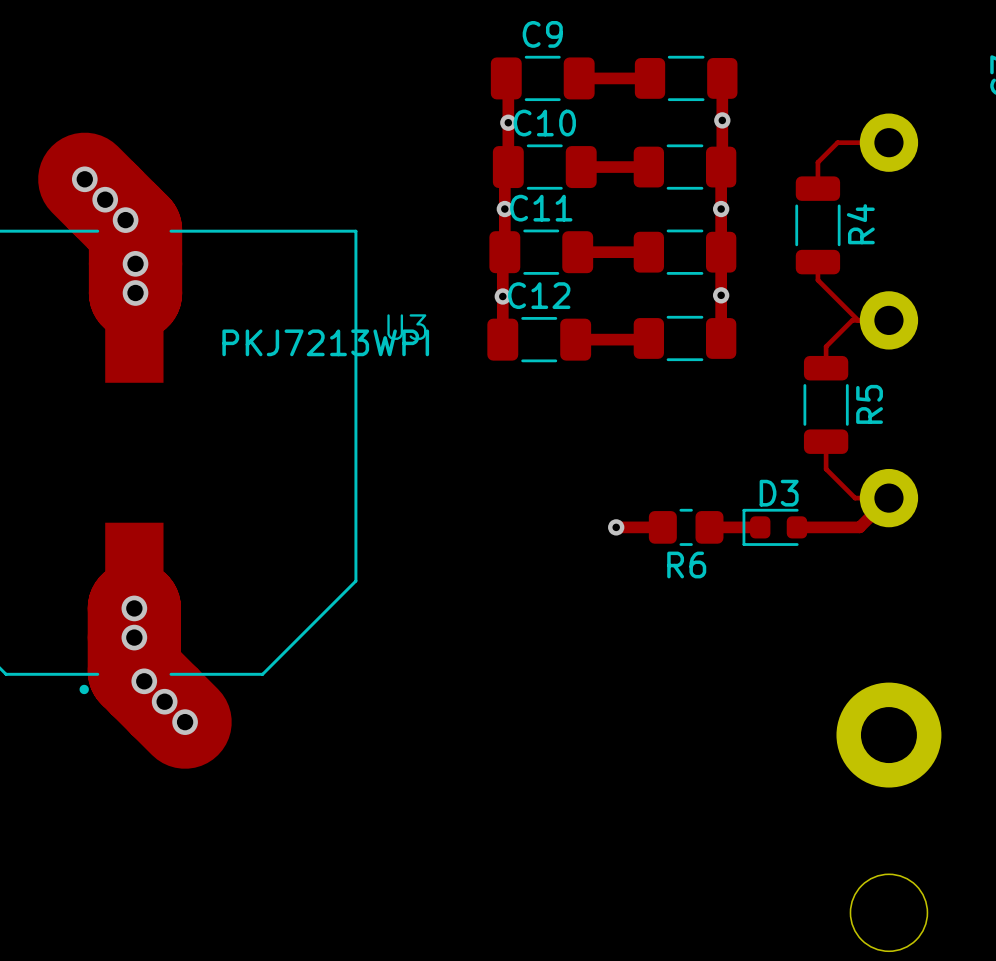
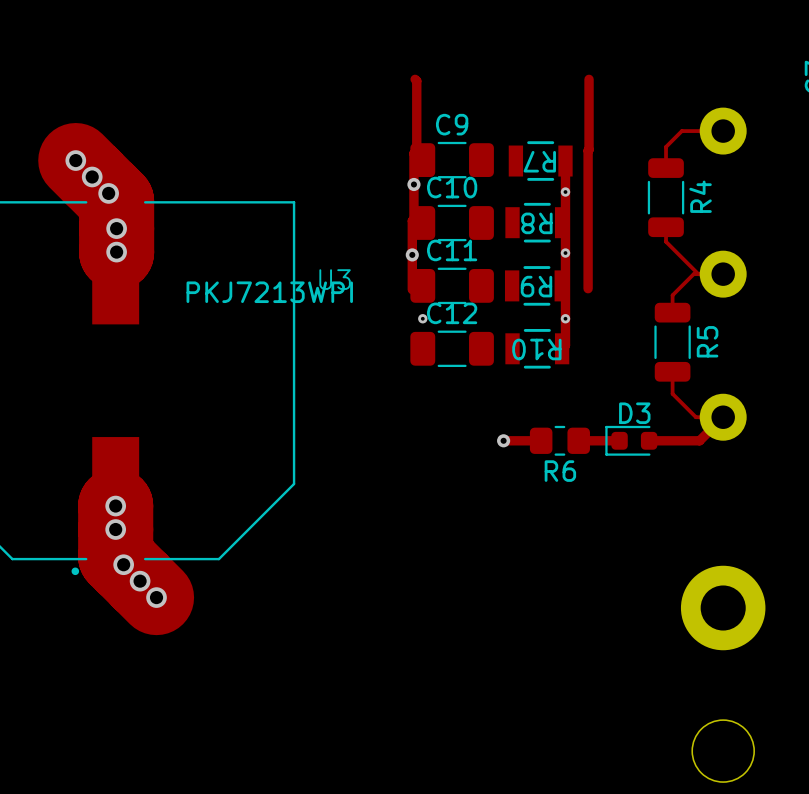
C9 position: (542, 78) -> (452, 160)
track: (579, 78) (650, 78) -> none
part: (686, 78) -> none
via: (722, 120) -> none
via: (508, 122) -> none
C10 position: (544, 167) -> (452, 222)
track: (581, 167) (648, 167) -> none
part: (685, 167) -> none
R7: none -> (540, 161)
track: none -> (565, 161) (565, 345) (562, 348)
via: (721, 209) -> none
via: none -> (565, 192)
C11 position: (541, 252) -> (452, 285)
track: (577, 252) (648, 252) -> none
part: (685, 252) -> none
R8: none -> (537, 222)
via: none -> (565, 253)
via: (721, 295) -> none
R9: none -> (536, 285)
track: (648, 338) (575, 339) -> none
part: (685, 338) -> none
C12 position: (539, 339) -> (452, 348)
via: none -> (422, 318)
via: none -> (565, 318)
R10: none -> (537, 348)

